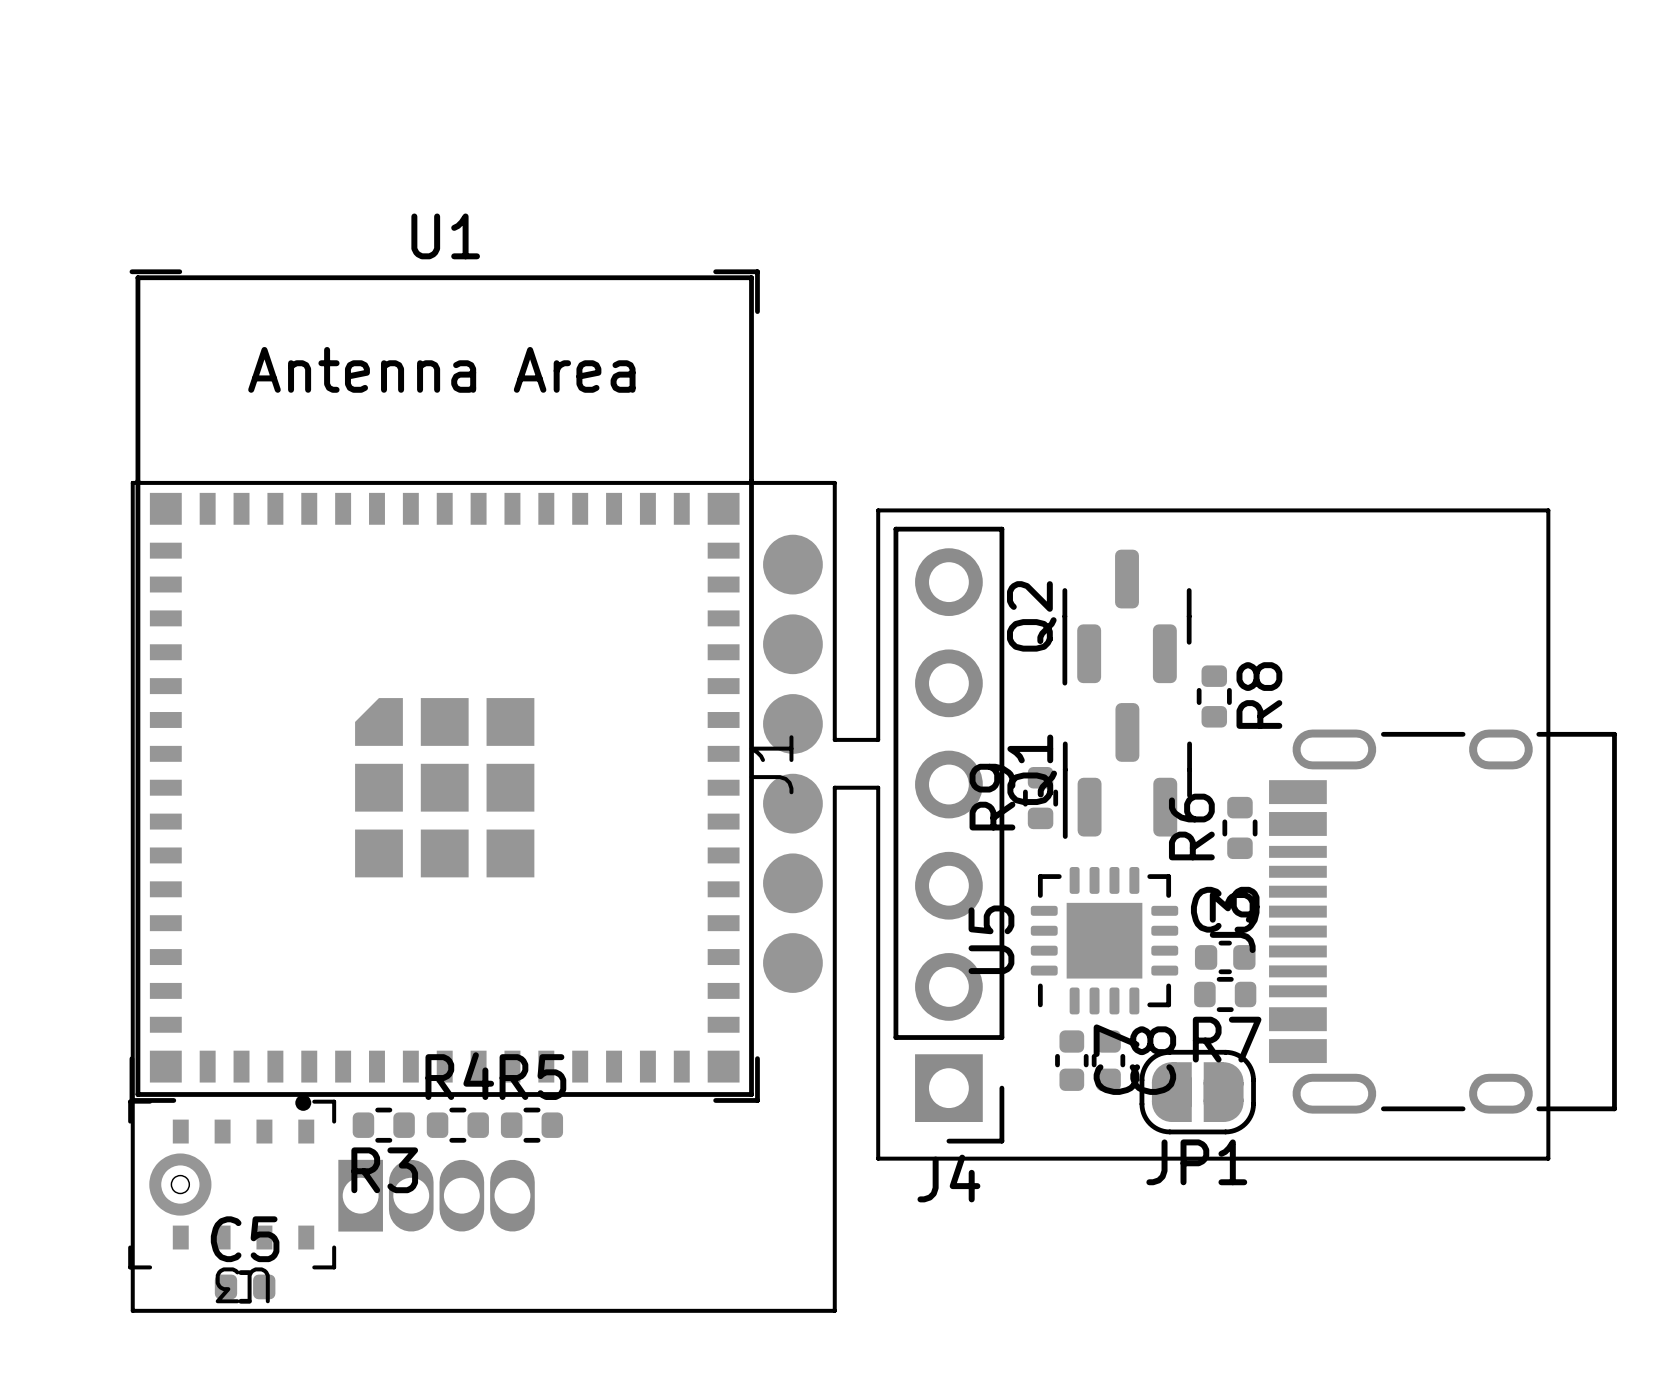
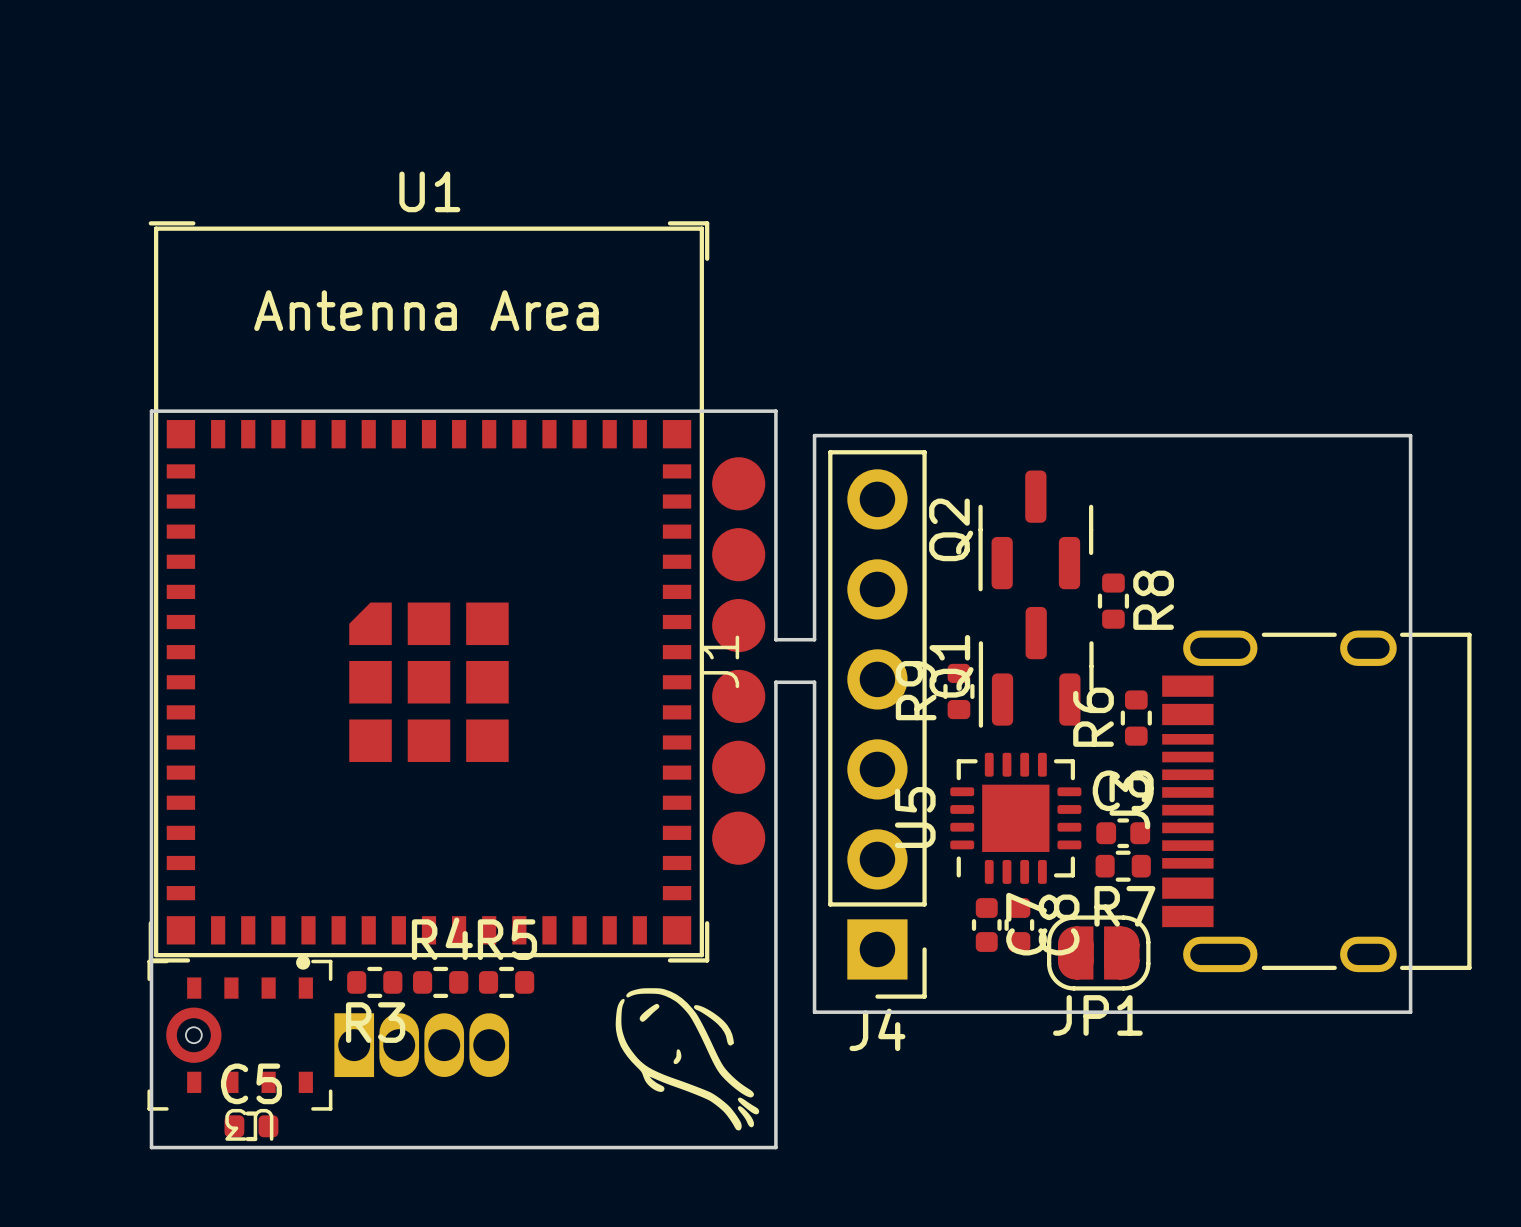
drawing: none -> [615, 988, 760, 1131]

